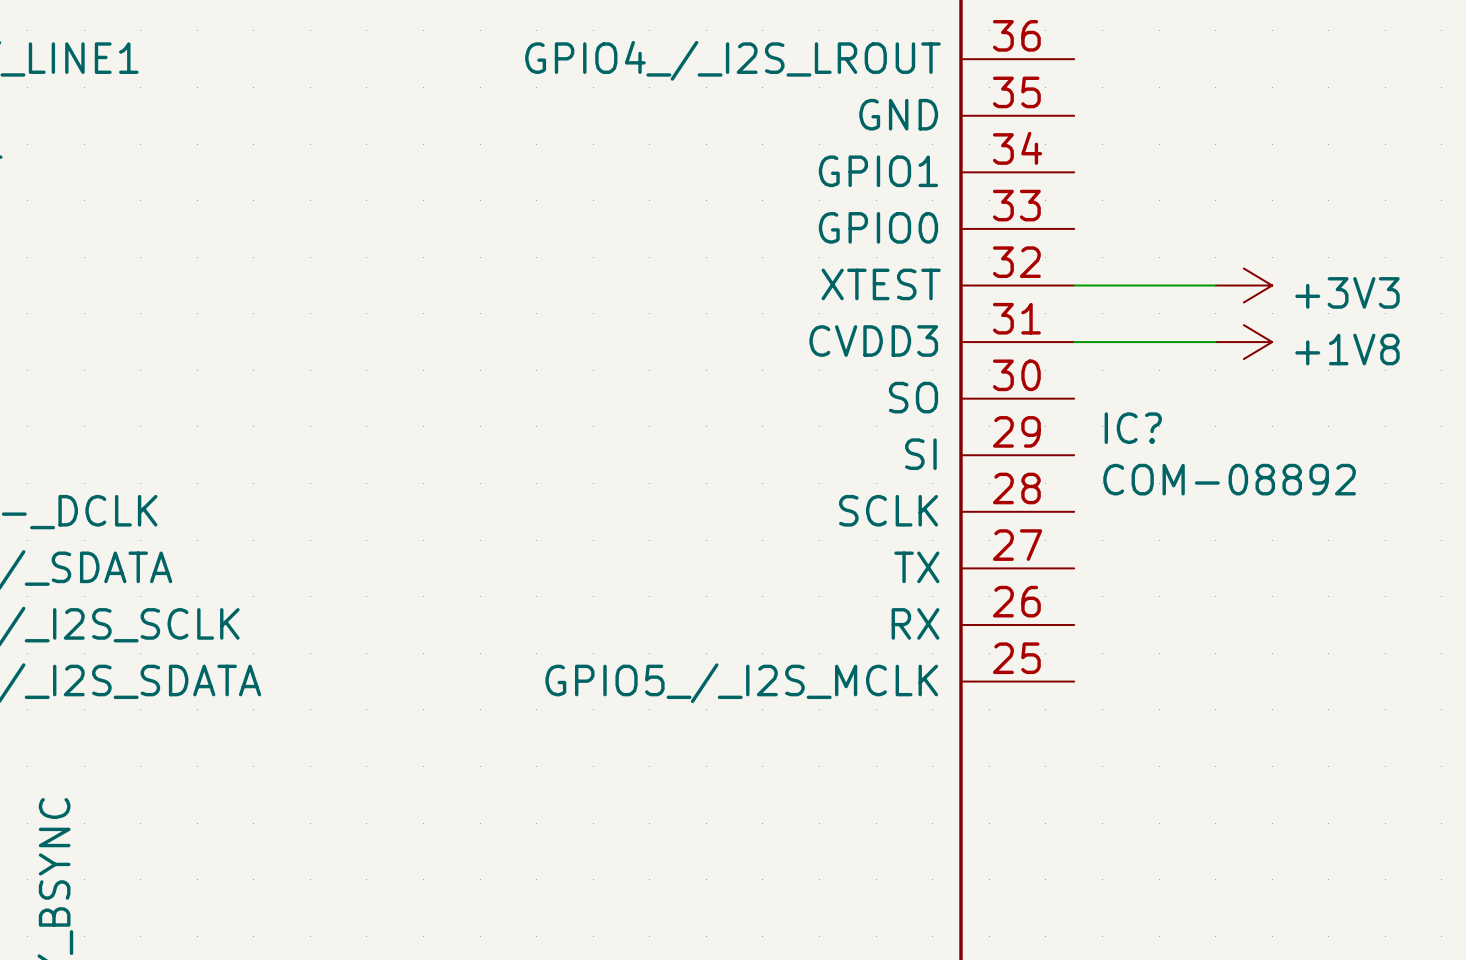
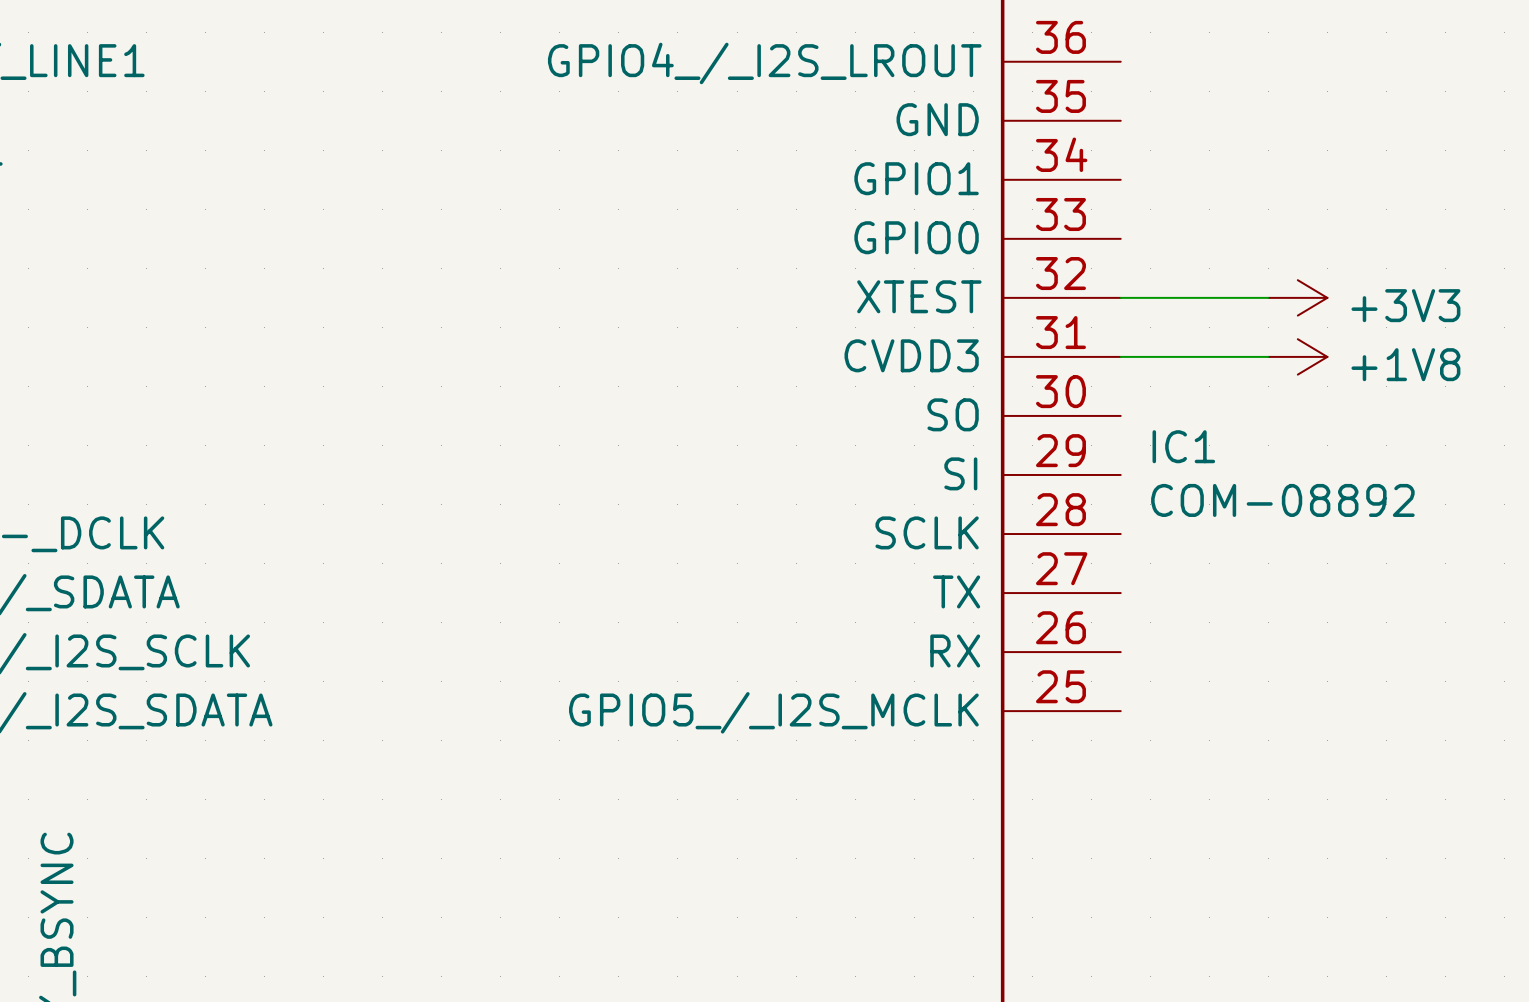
IC? name: IC? (1133, 428) -> IC1 (1183, 446)

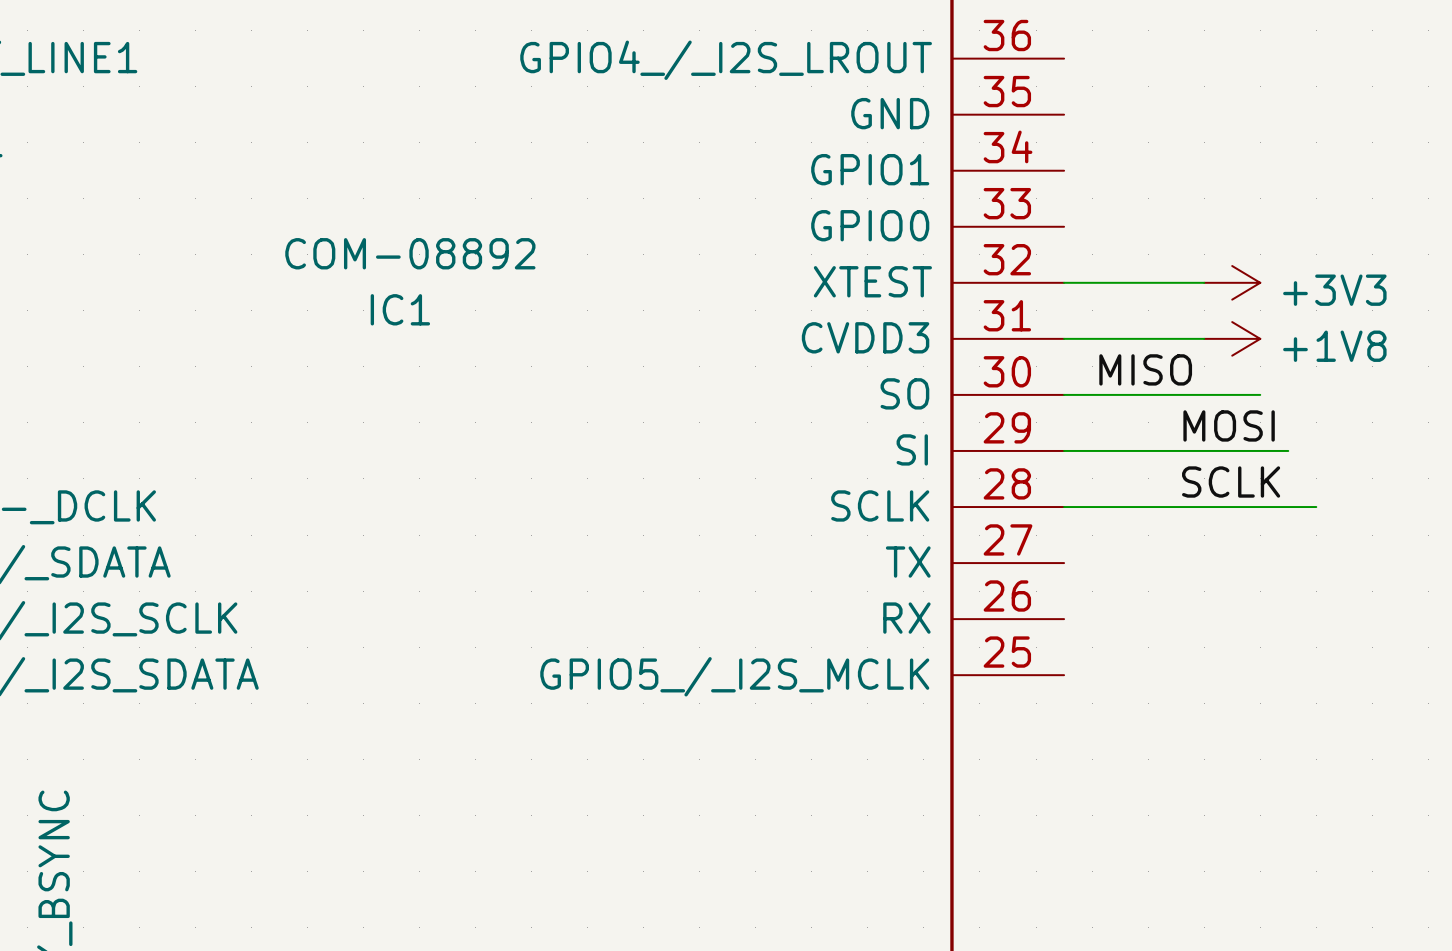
label: none -> MISO (1145, 369)
wire: none -> (1064, 394) (1260, 394)
IC1 name position: IC1 (1183, 446) -> IC1 (400, 309)
label: none -> MOSI (1229, 425)
wire: none -> (1064, 450) (1288, 450)
IC1 value position: COM-08892 (1282, 500) -> COM-08892 (410, 253)
label: none -> SCLK (1231, 482)
wire: none -> (1064, 507) (1316, 507)

